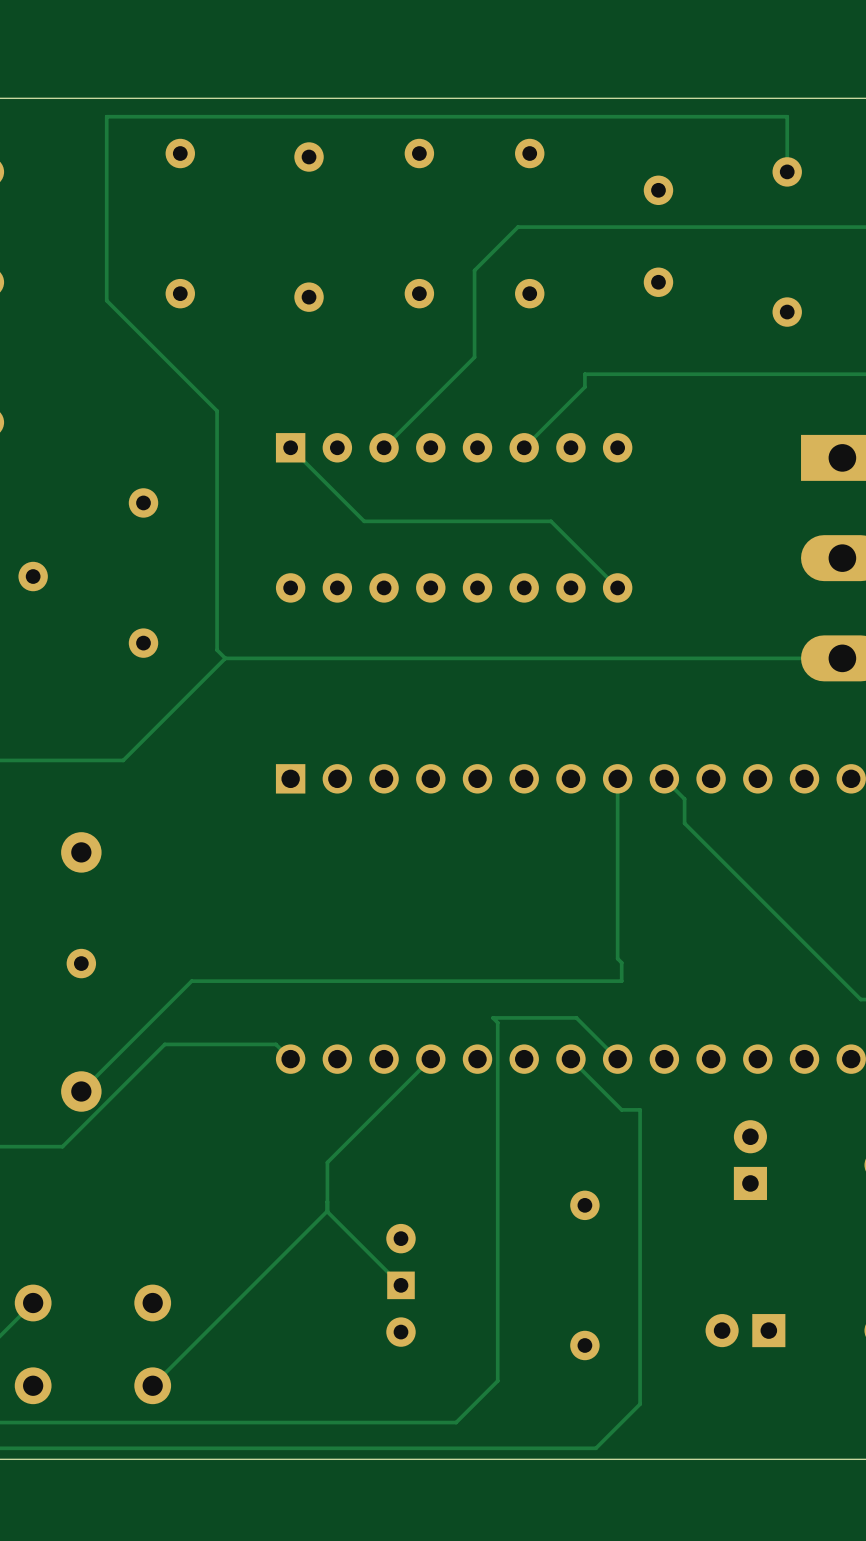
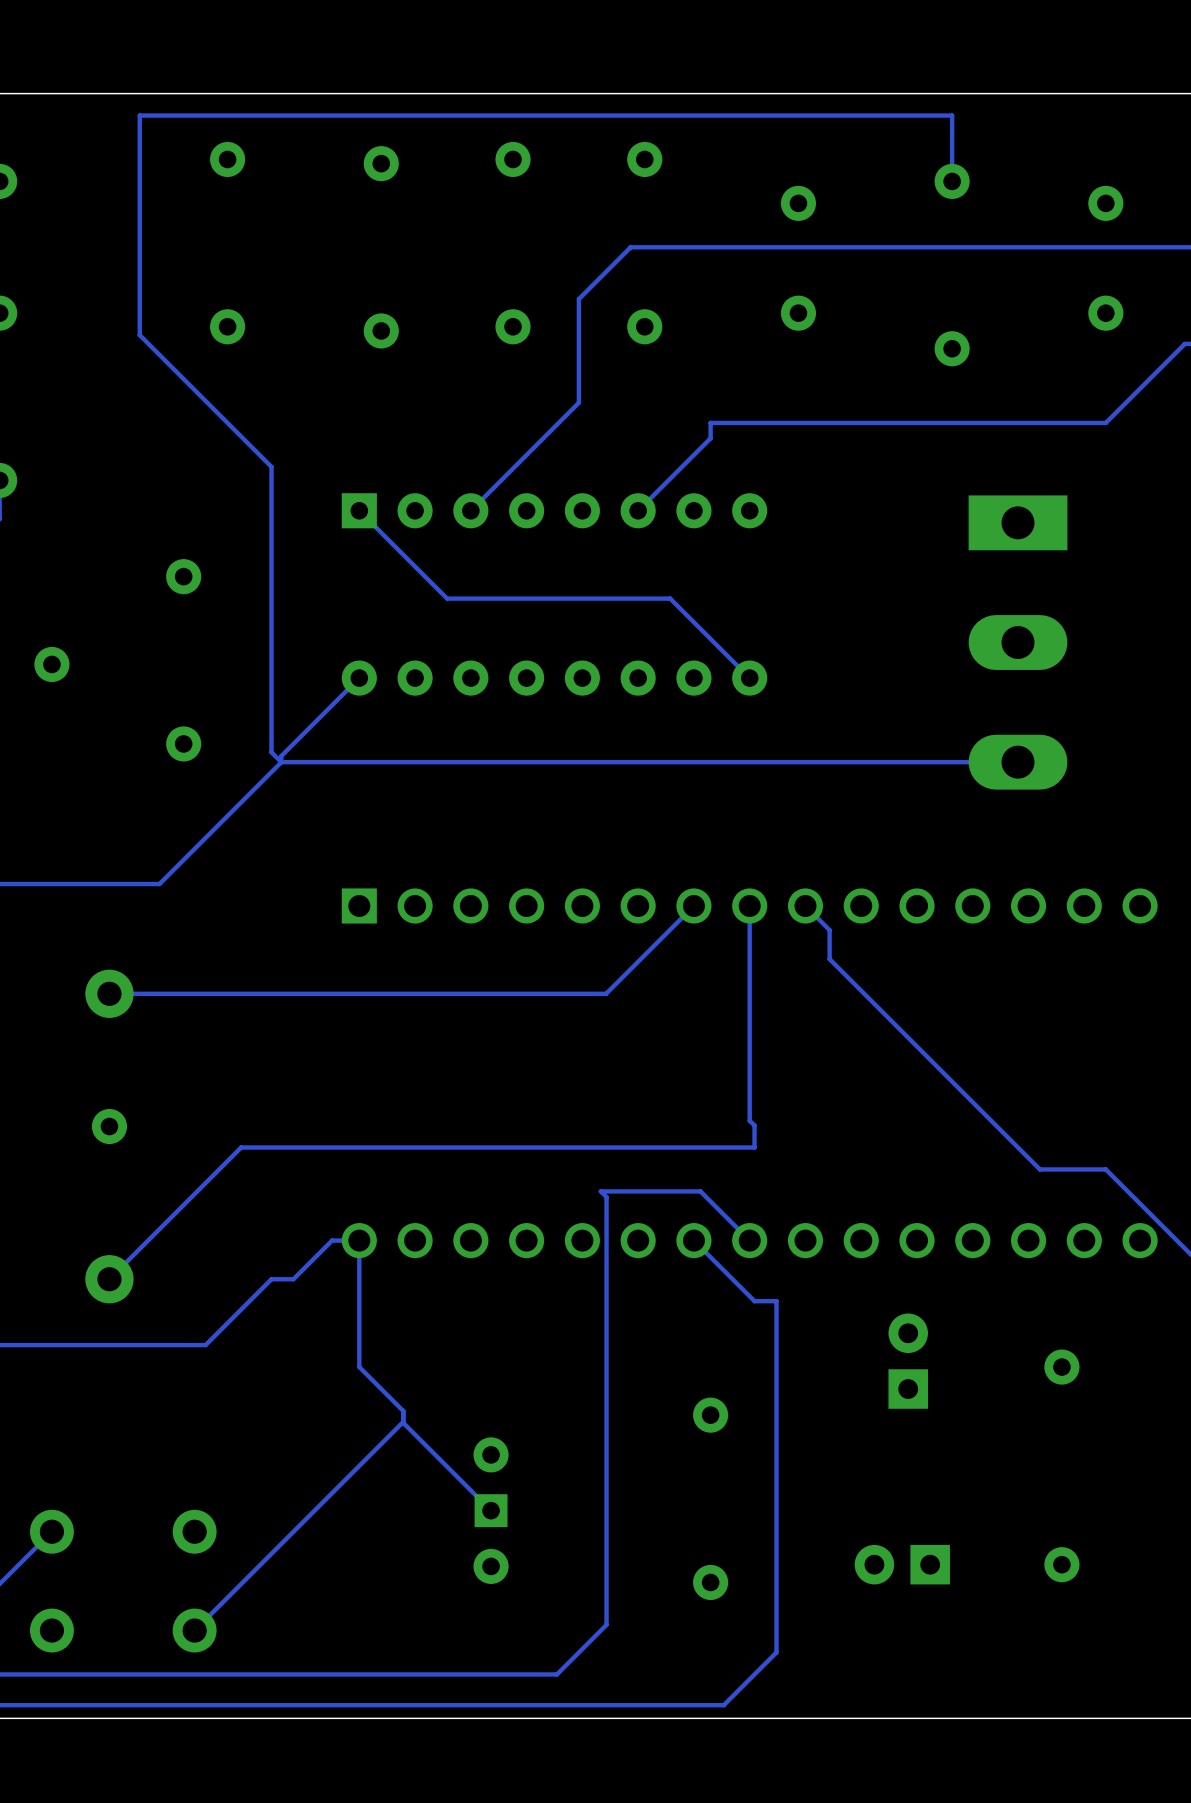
track: none -> (359, 678) (281, 756) (281, 762)
track: none -> (693, 905) (606, 993) (109, 993)
track: (290, 1059) (275, 1044) (164, 1044) (62, 1146) -> (403, 1410) (359, 1367) (359, 1240) (332, 1240) (293, 1279) (271, 1279) (205, 1345) (87, 1345)
track: (430, 1059) (327, 1162) (327, 1201) -> none

